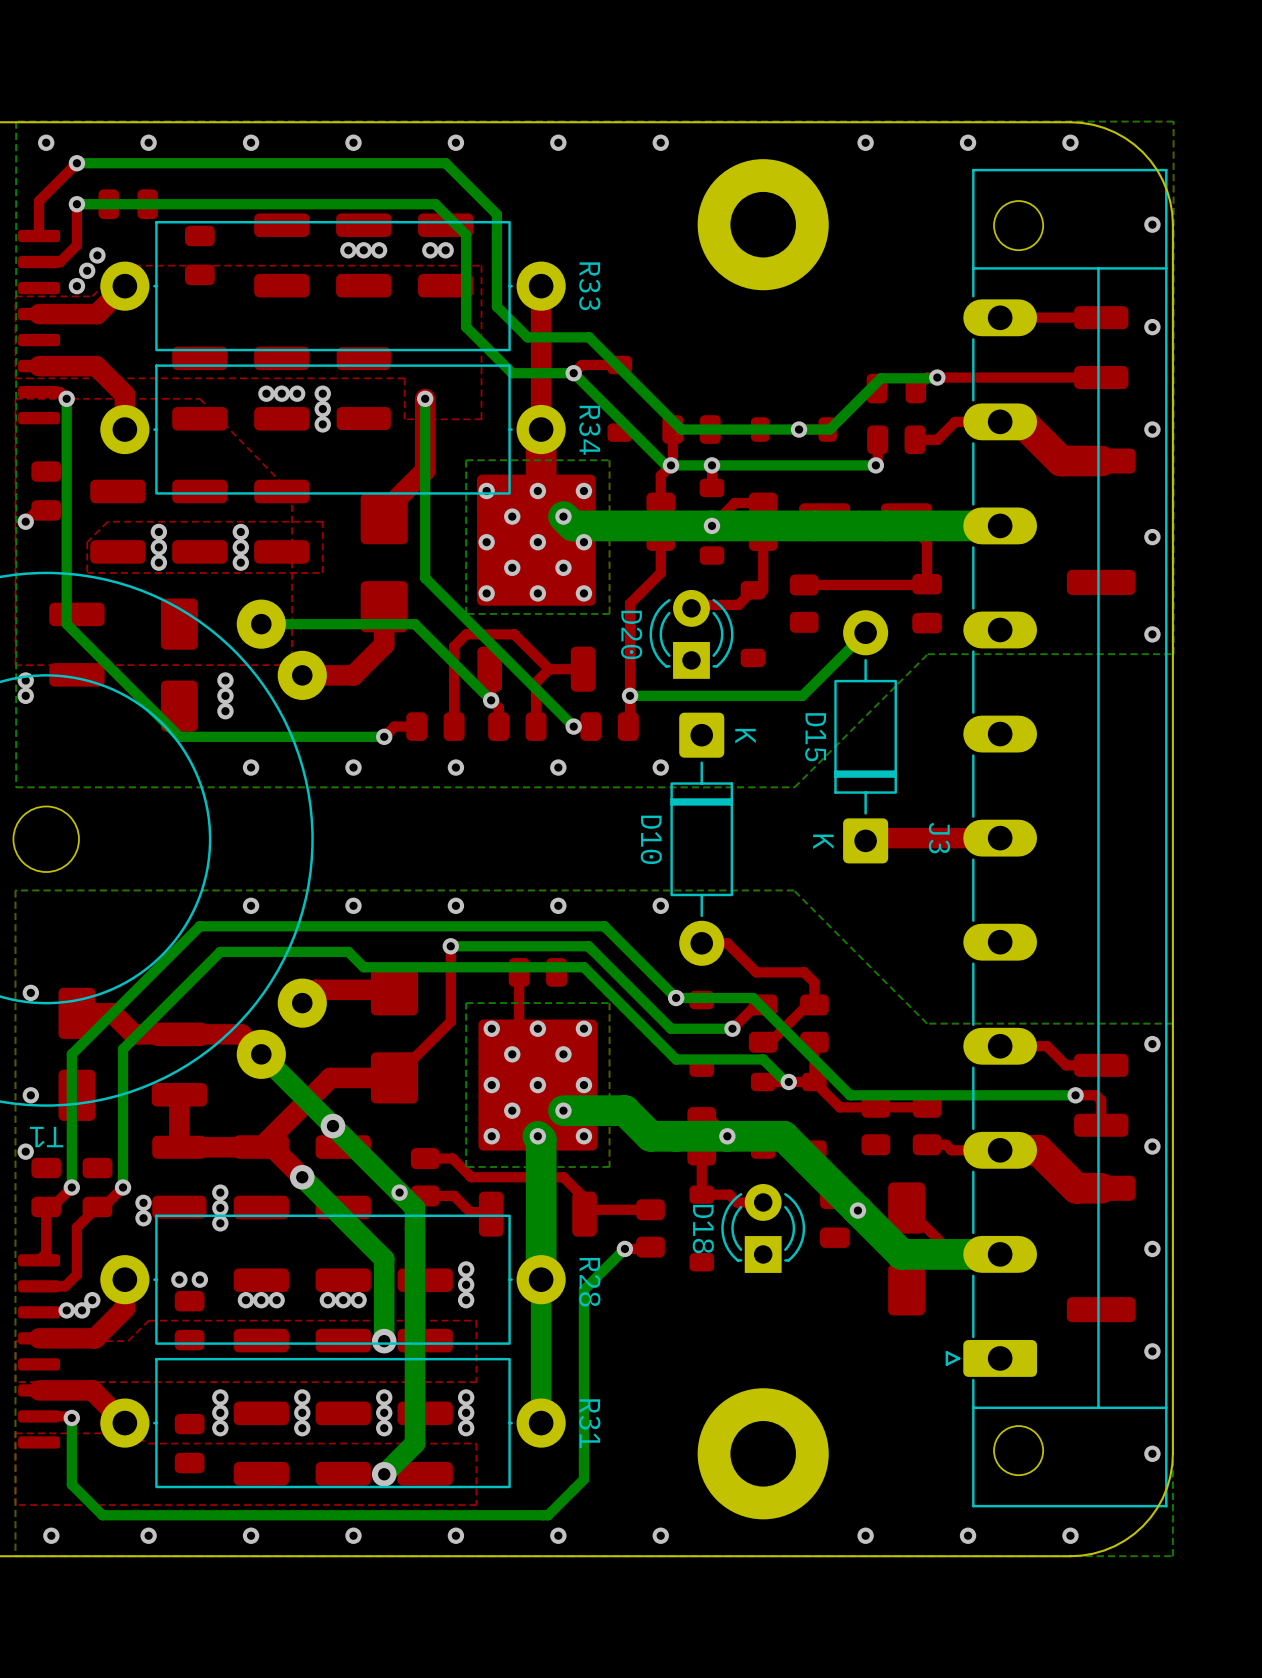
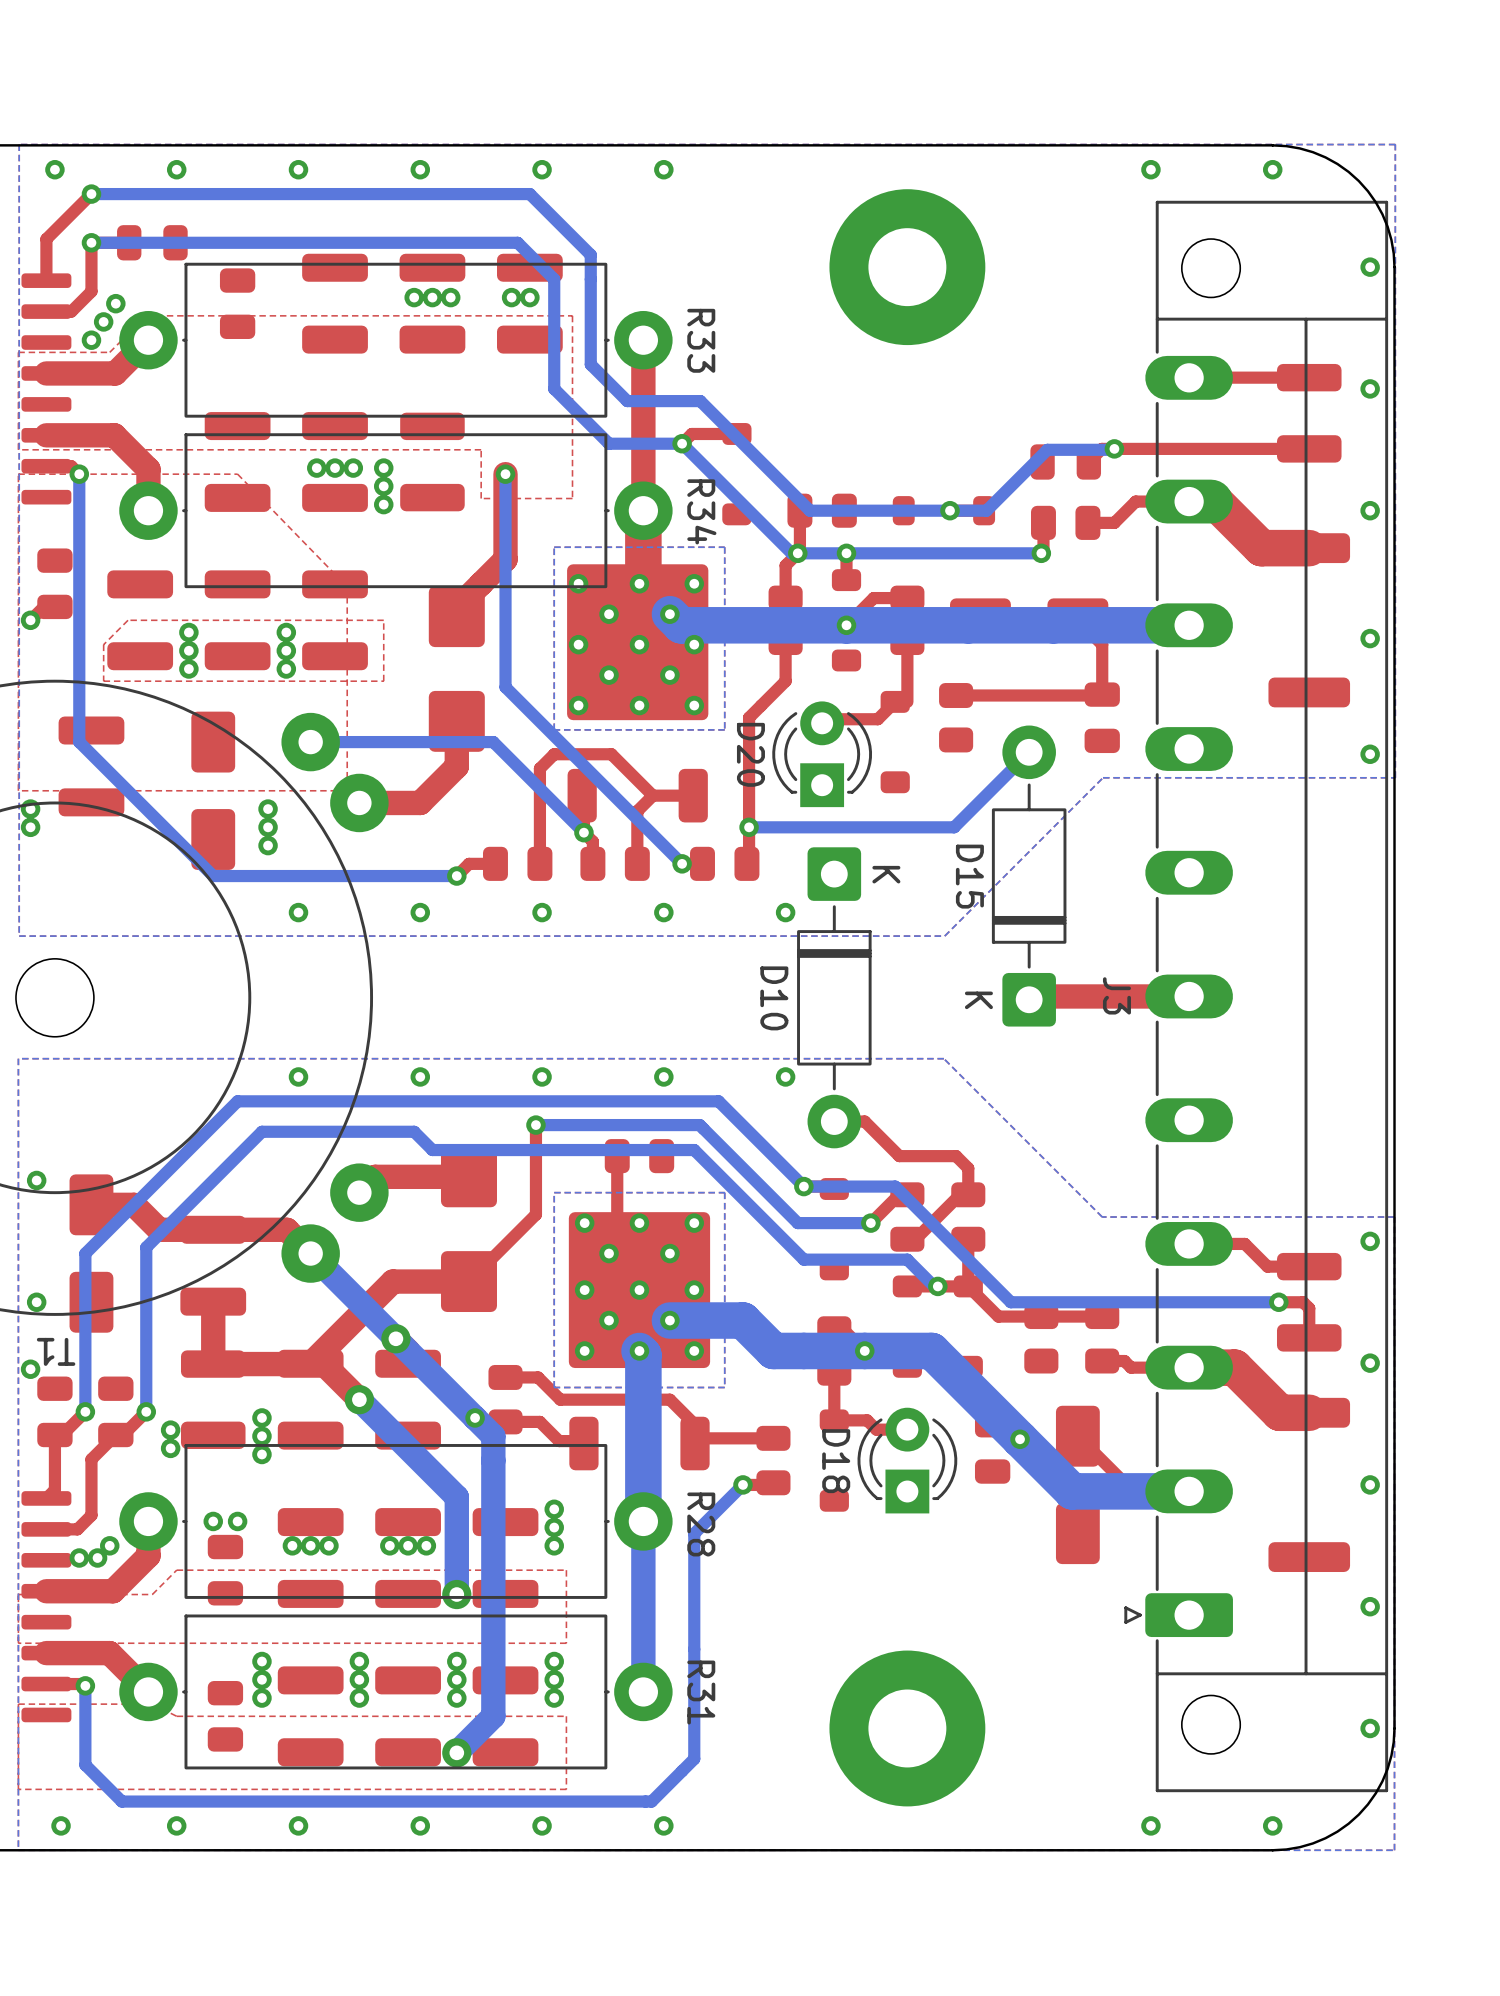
via: (660, 142) -> none
via: (865, 142) -> none
via: (660, 1535) -> none
via: (865, 1535) -> none

